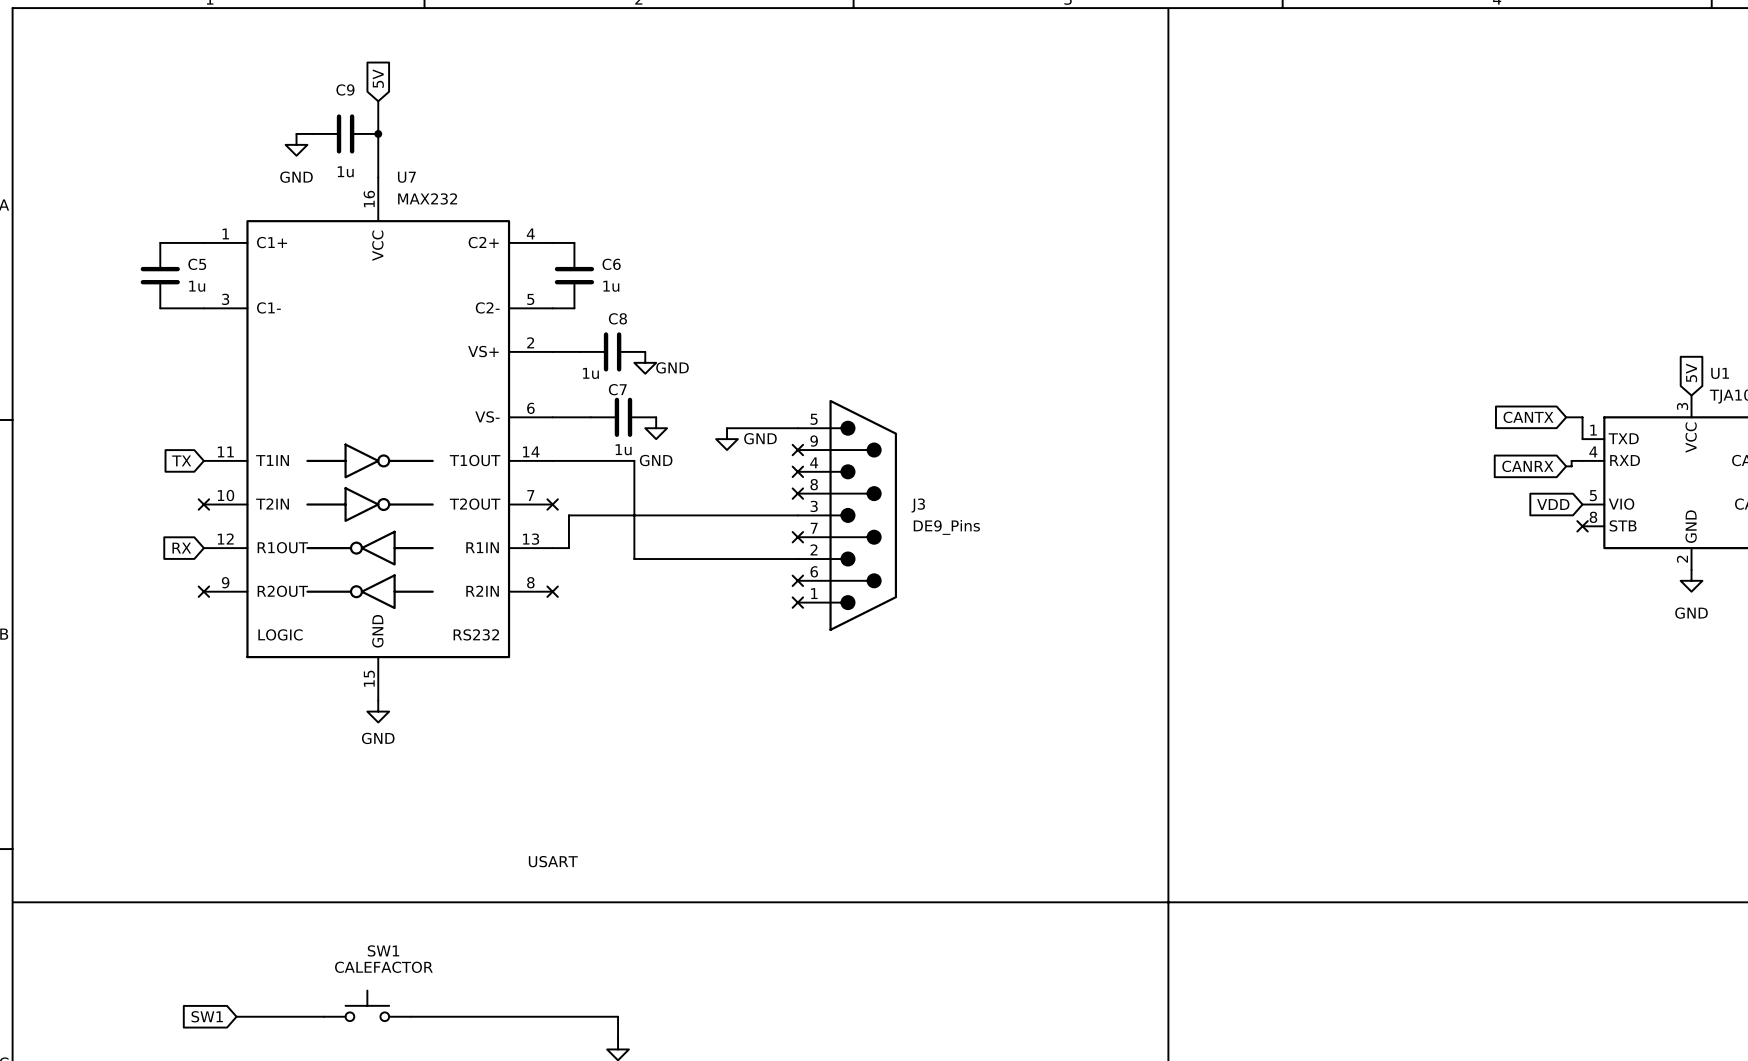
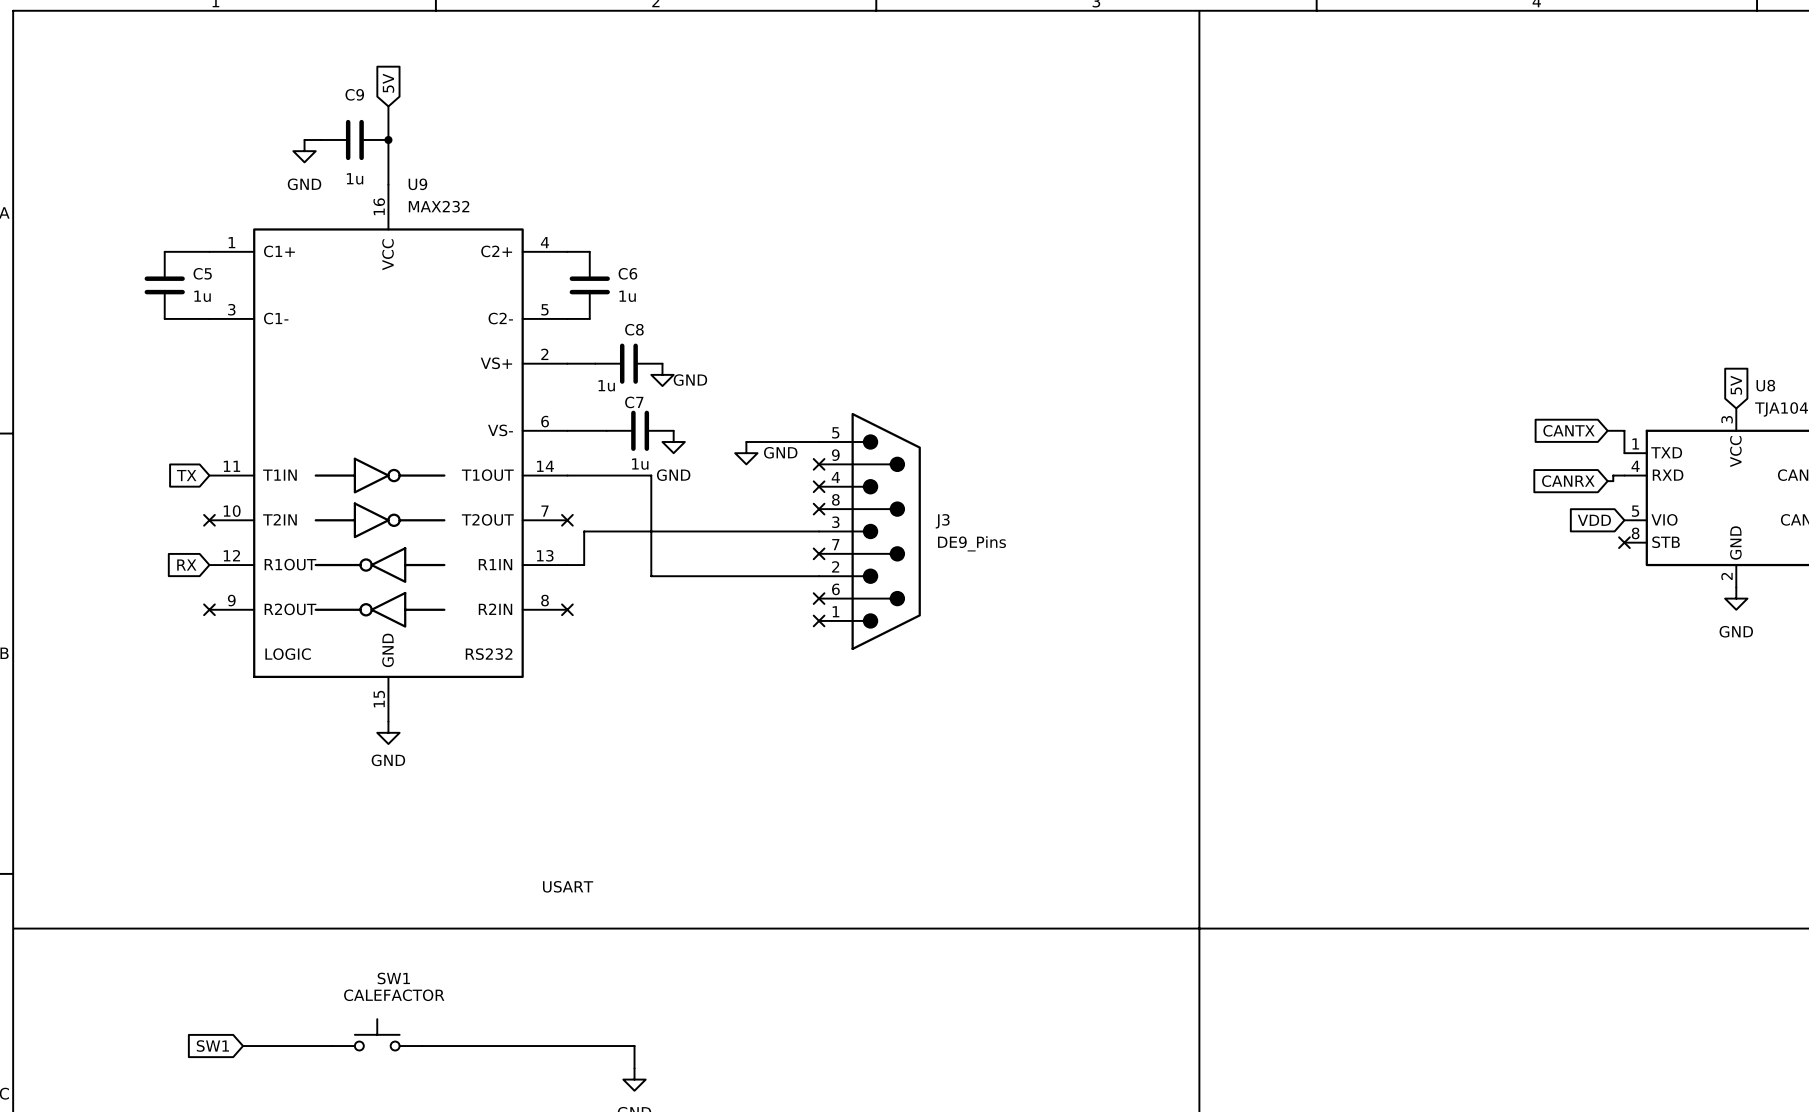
U7 name: U7 (406, 177) -> U9 (417, 184)
U1 name: U1 (1720, 373) -> U8 (1765, 385)

